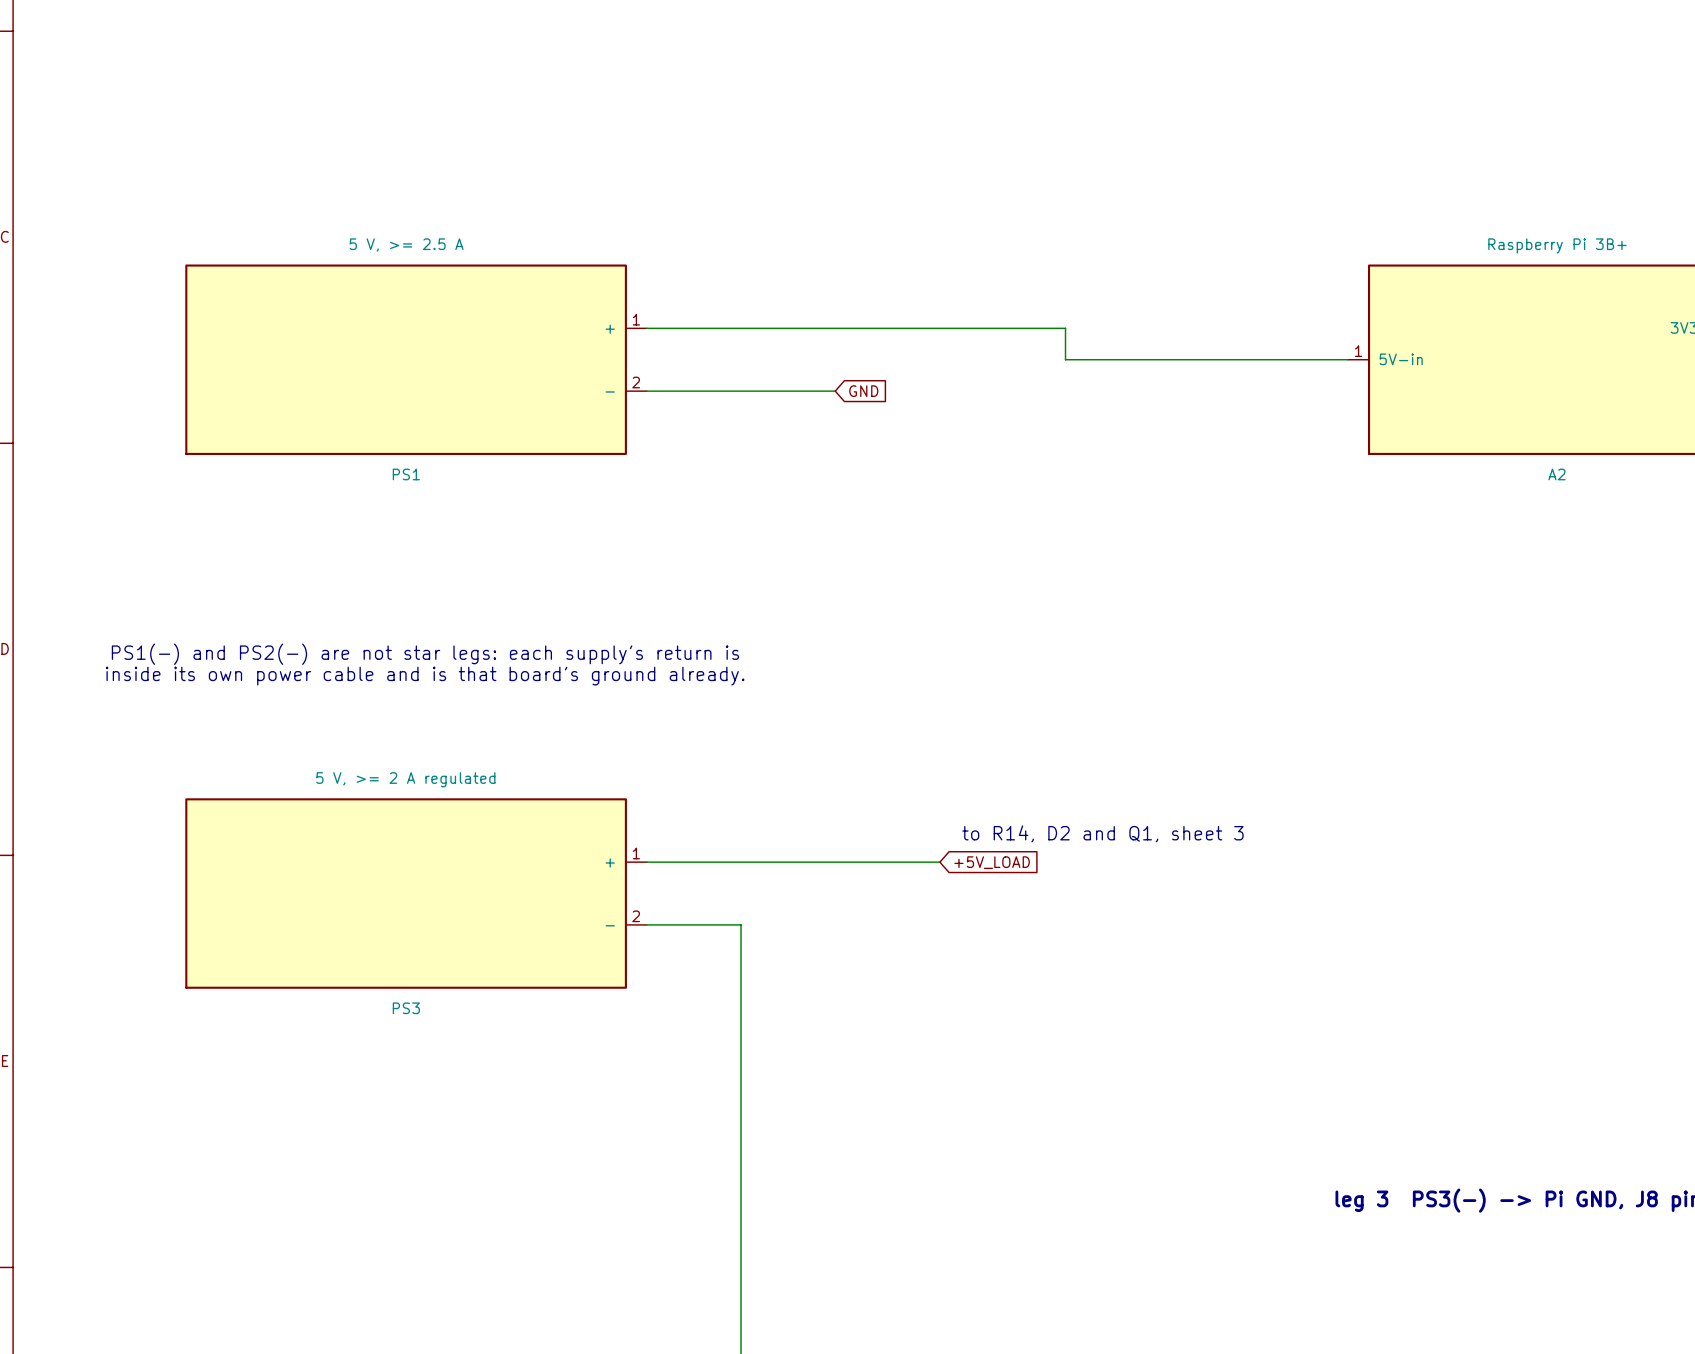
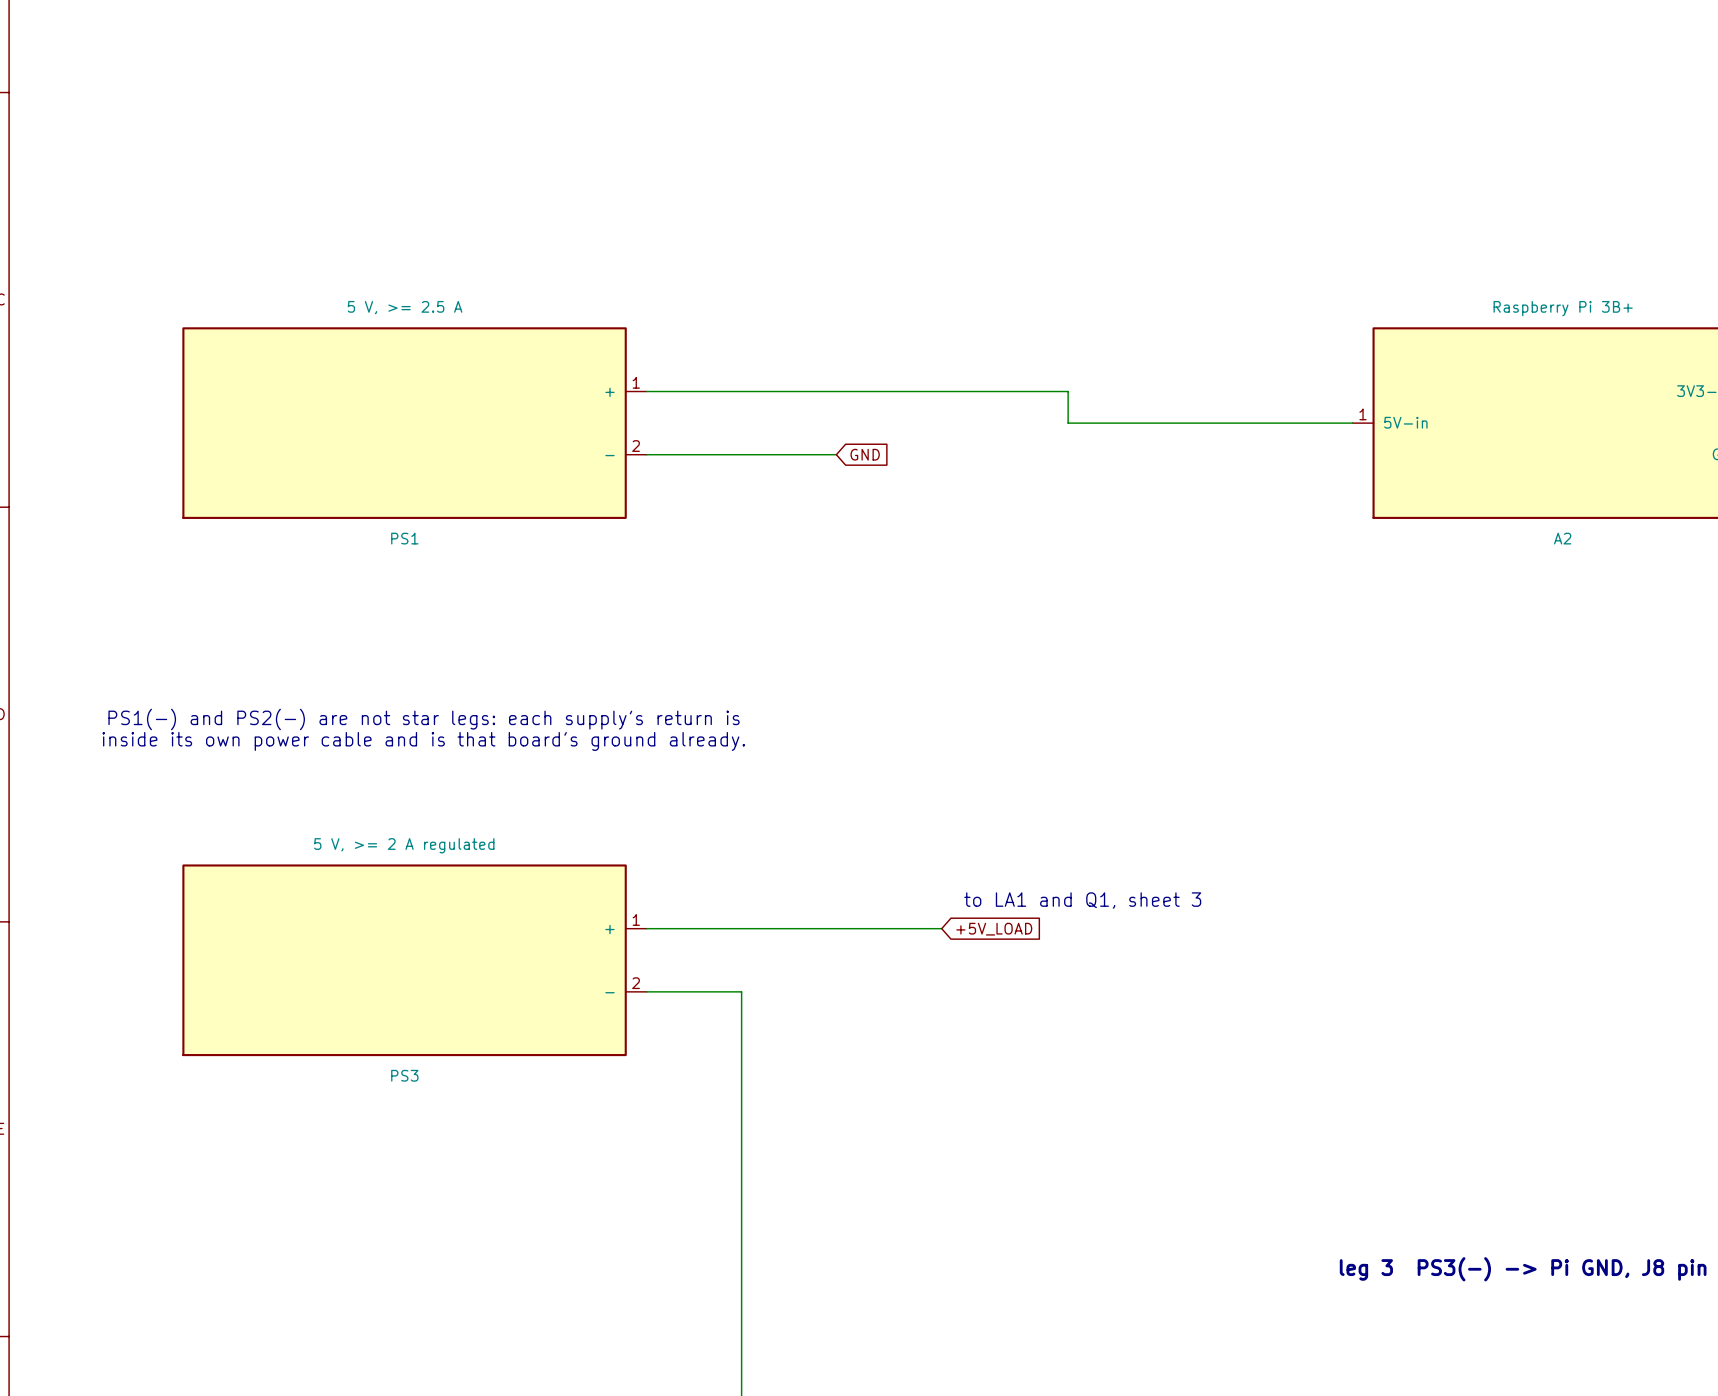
text: to R14, D2 and Q1, sheet 3 (1102, 833) -> to LA1 and Q1, sheet 3 (1082, 900)

